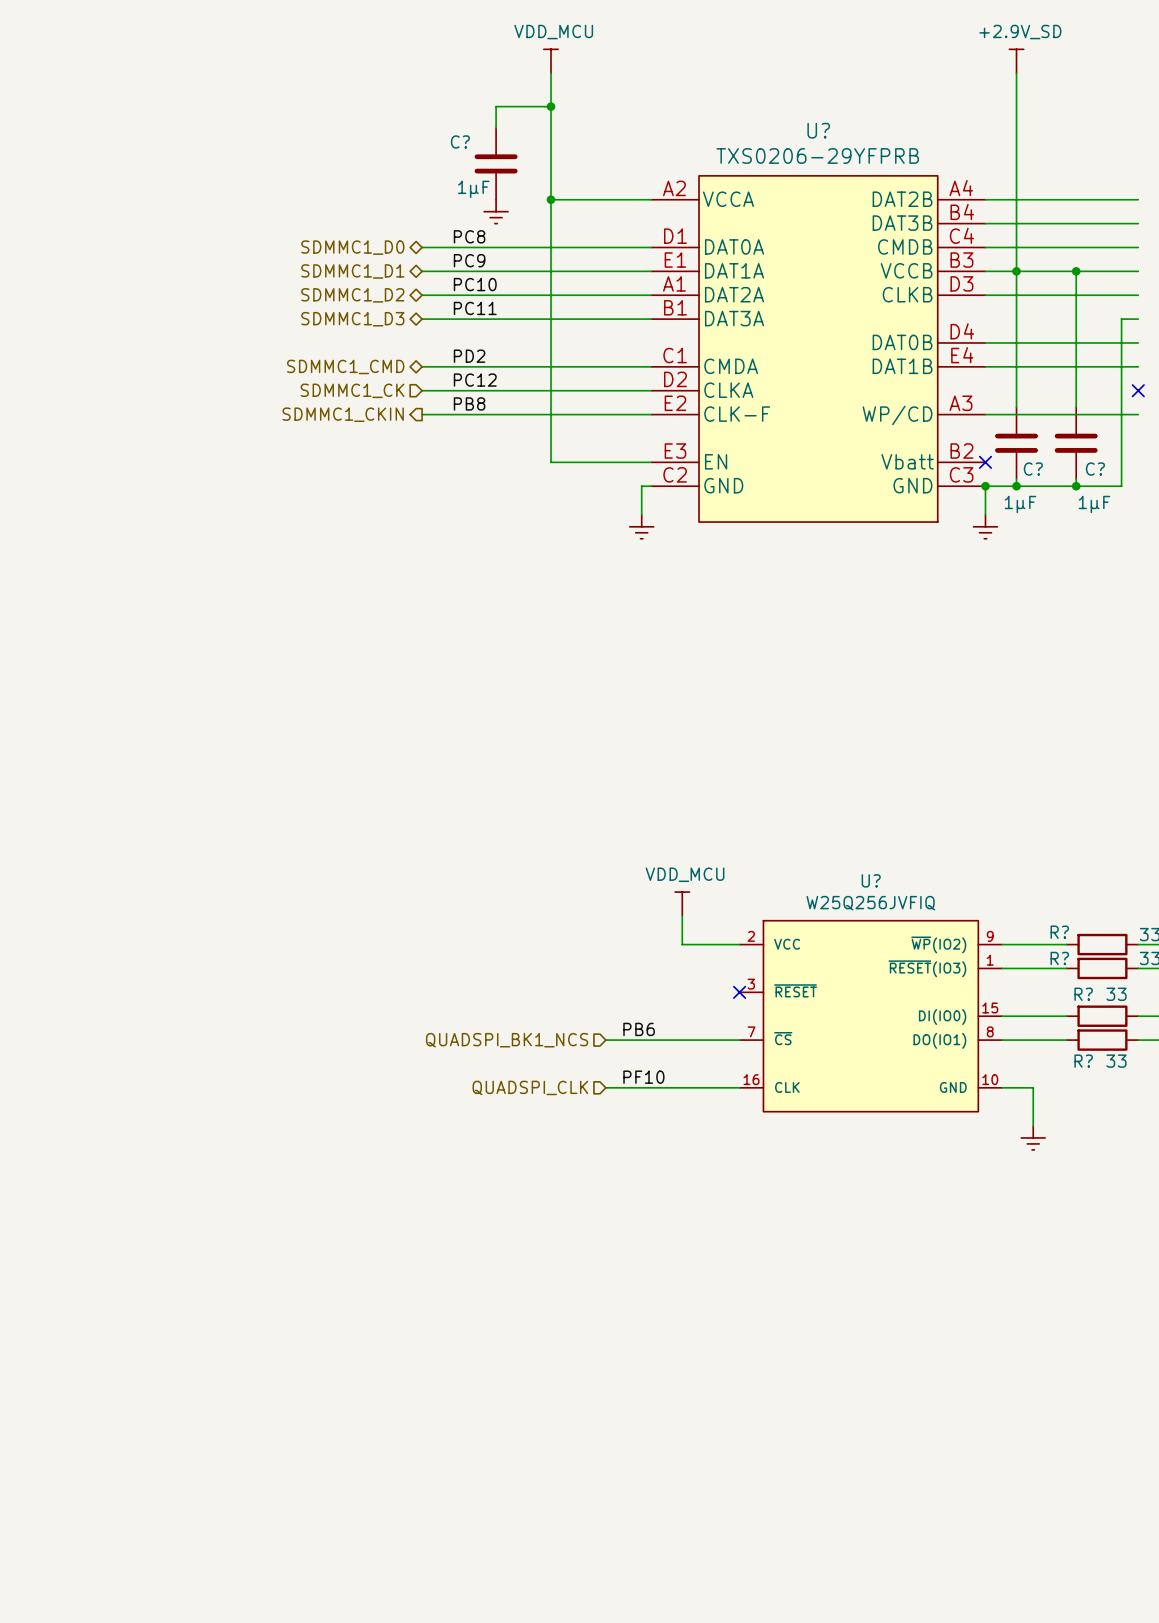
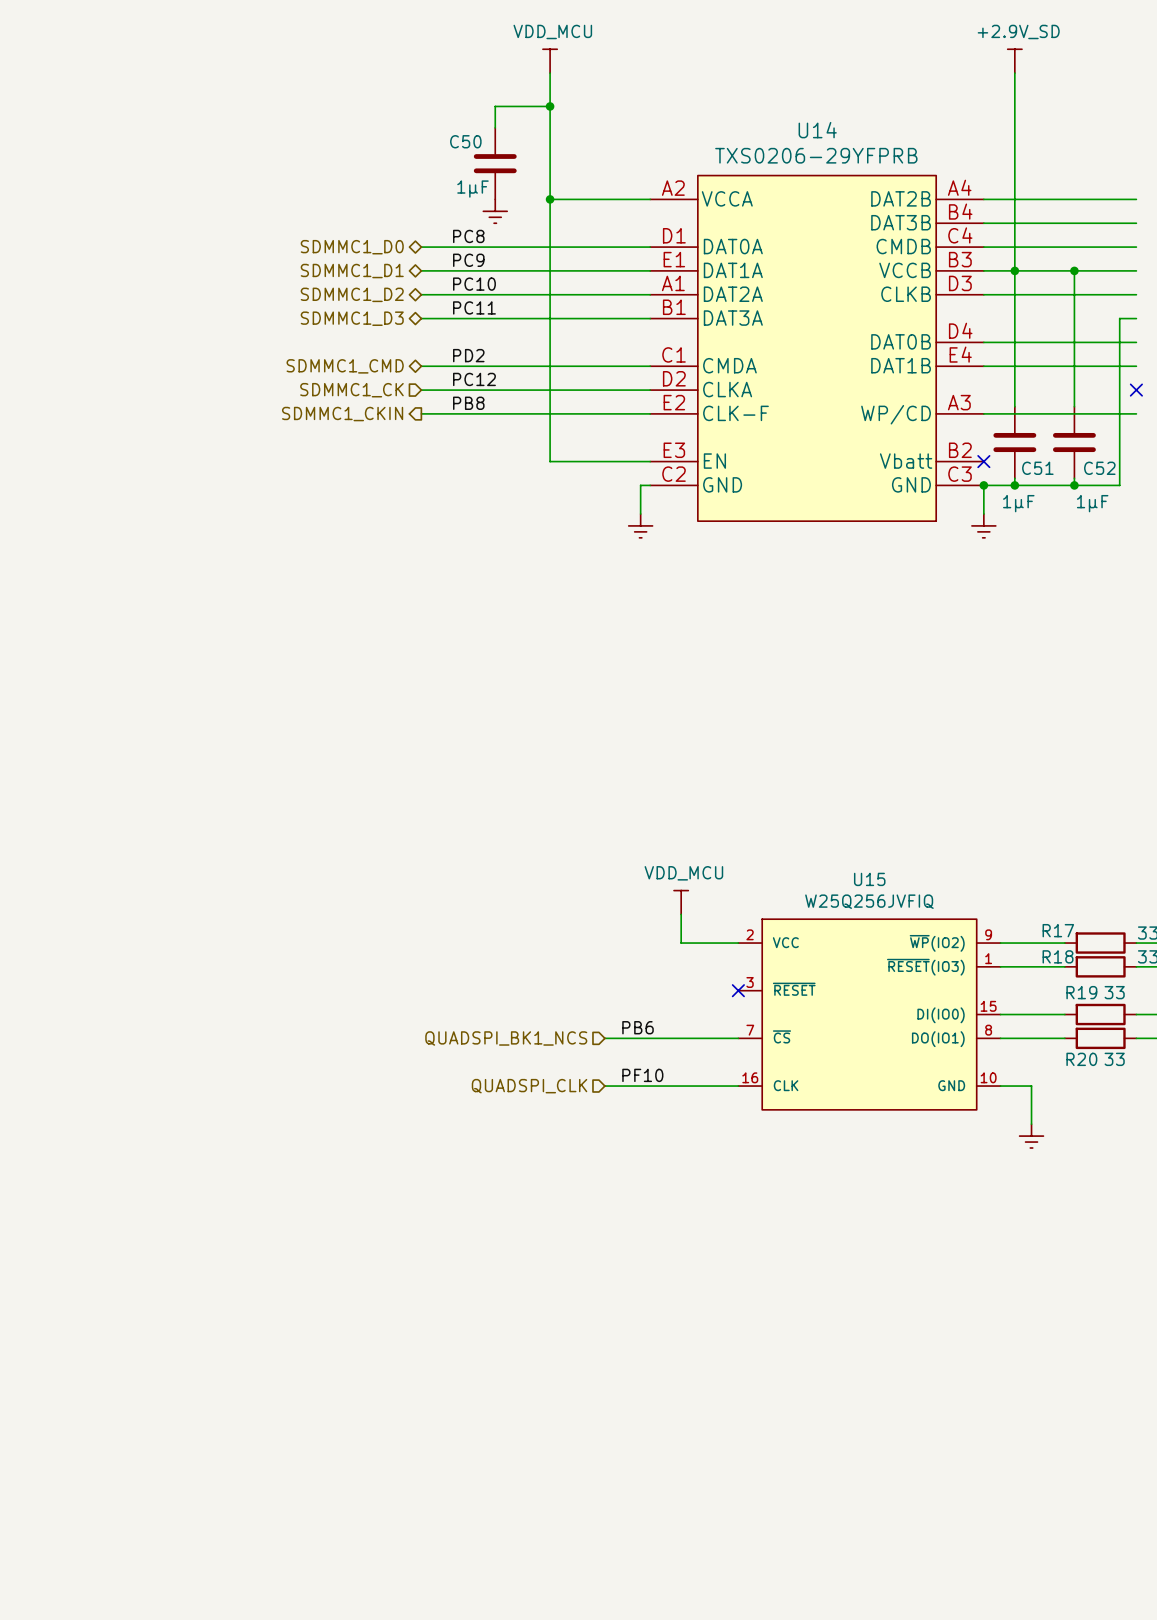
U? name: U? (818, 130) -> U14 (817, 130)
C? name: C? (460, 141) -> C50 (465, 141)
C? name: C? (1033, 469) -> C51 (1037, 468)
C? name: C? (1095, 469) -> C52 (1099, 468)
U? name: U? (871, 880) -> U15 (869, 879)
R? name: R? (1059, 932) -> R17 (1058, 930)
R? name: R? (1059, 958) -> R18 (1058, 956)
R? name: R? (1083, 994) -> R19 (1081, 992)
R? name: R? (1083, 1061) -> R20 (1081, 1059)

